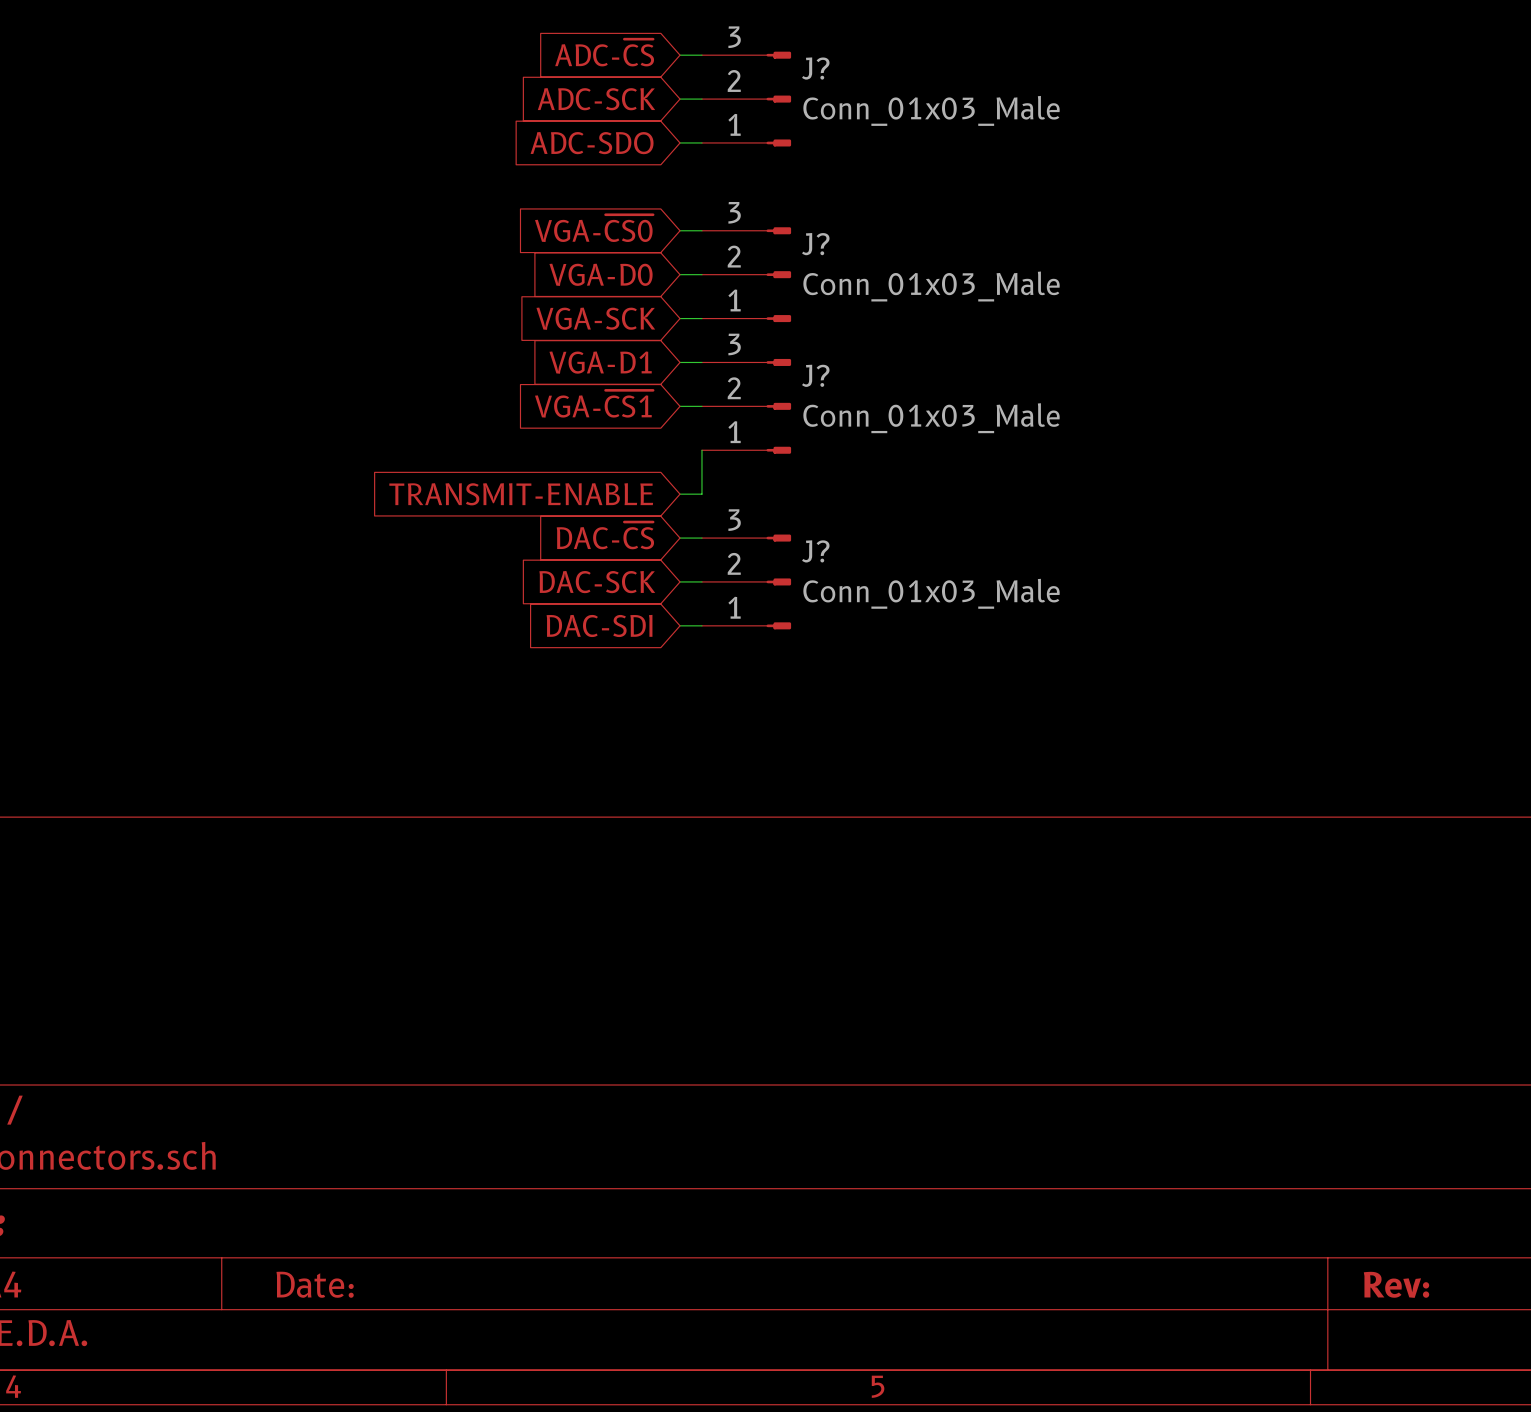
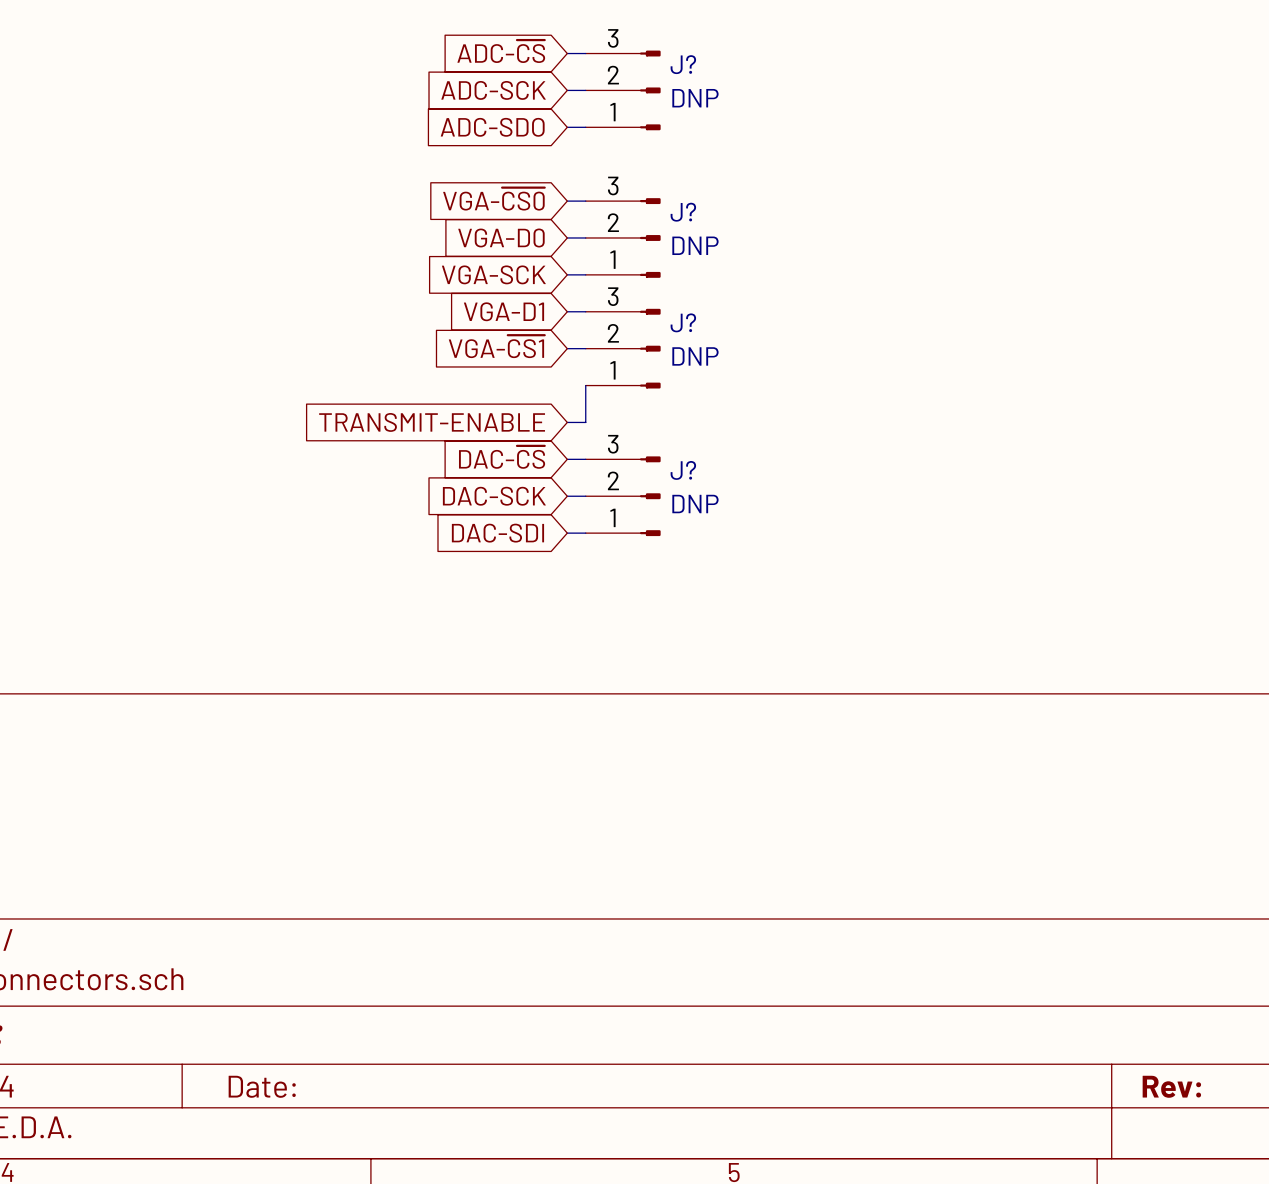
J? value: Conn_01x03_Male (931, 110) -> DNP (695, 98)
J? value: Conn_01x03_Male (931, 286) -> DNP (695, 245)
J? value: Conn_01x03_Male (931, 418) -> DNP (695, 356)
J? value: Conn_01x03_Male (931, 593) -> DNP (695, 504)

